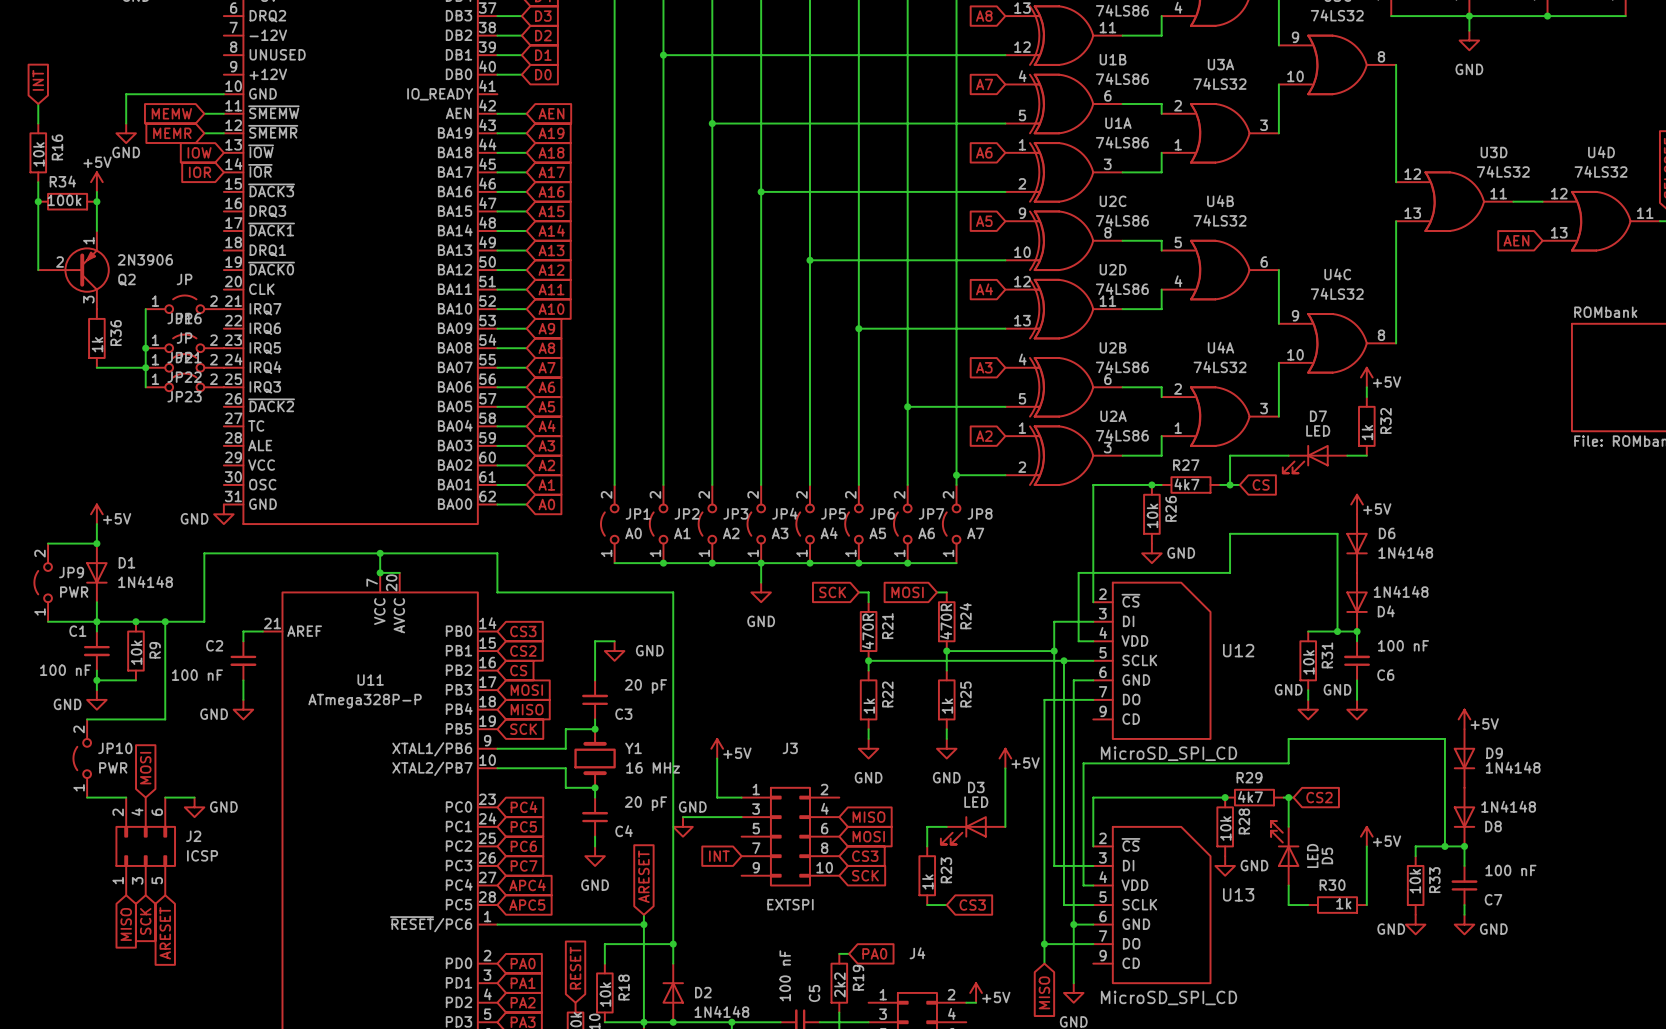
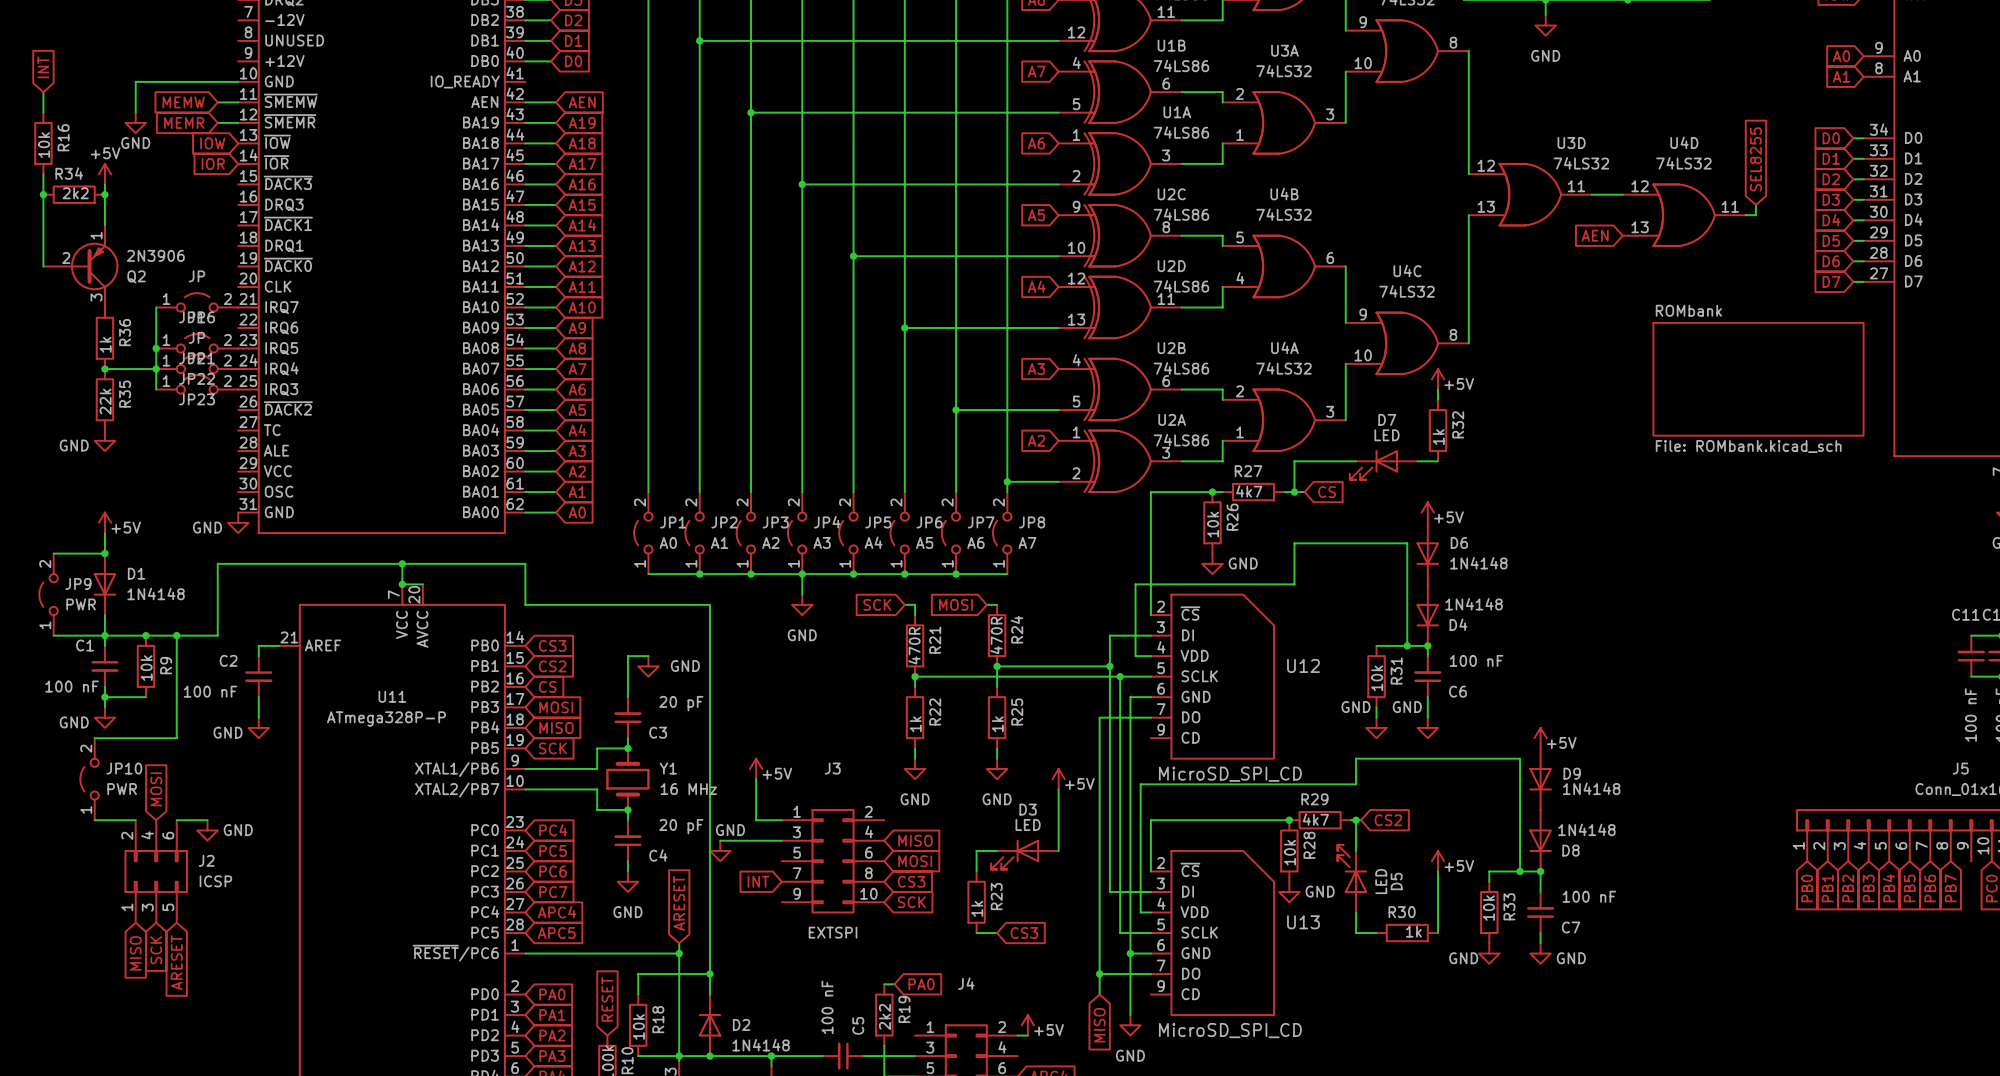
R34 value: 100k (64, 200) -> 2k2 (75, 193)
junction: none -> (104, 369)
R35: none -> 22k (104, 399)
power symbol: none -> GND (104, 440)

